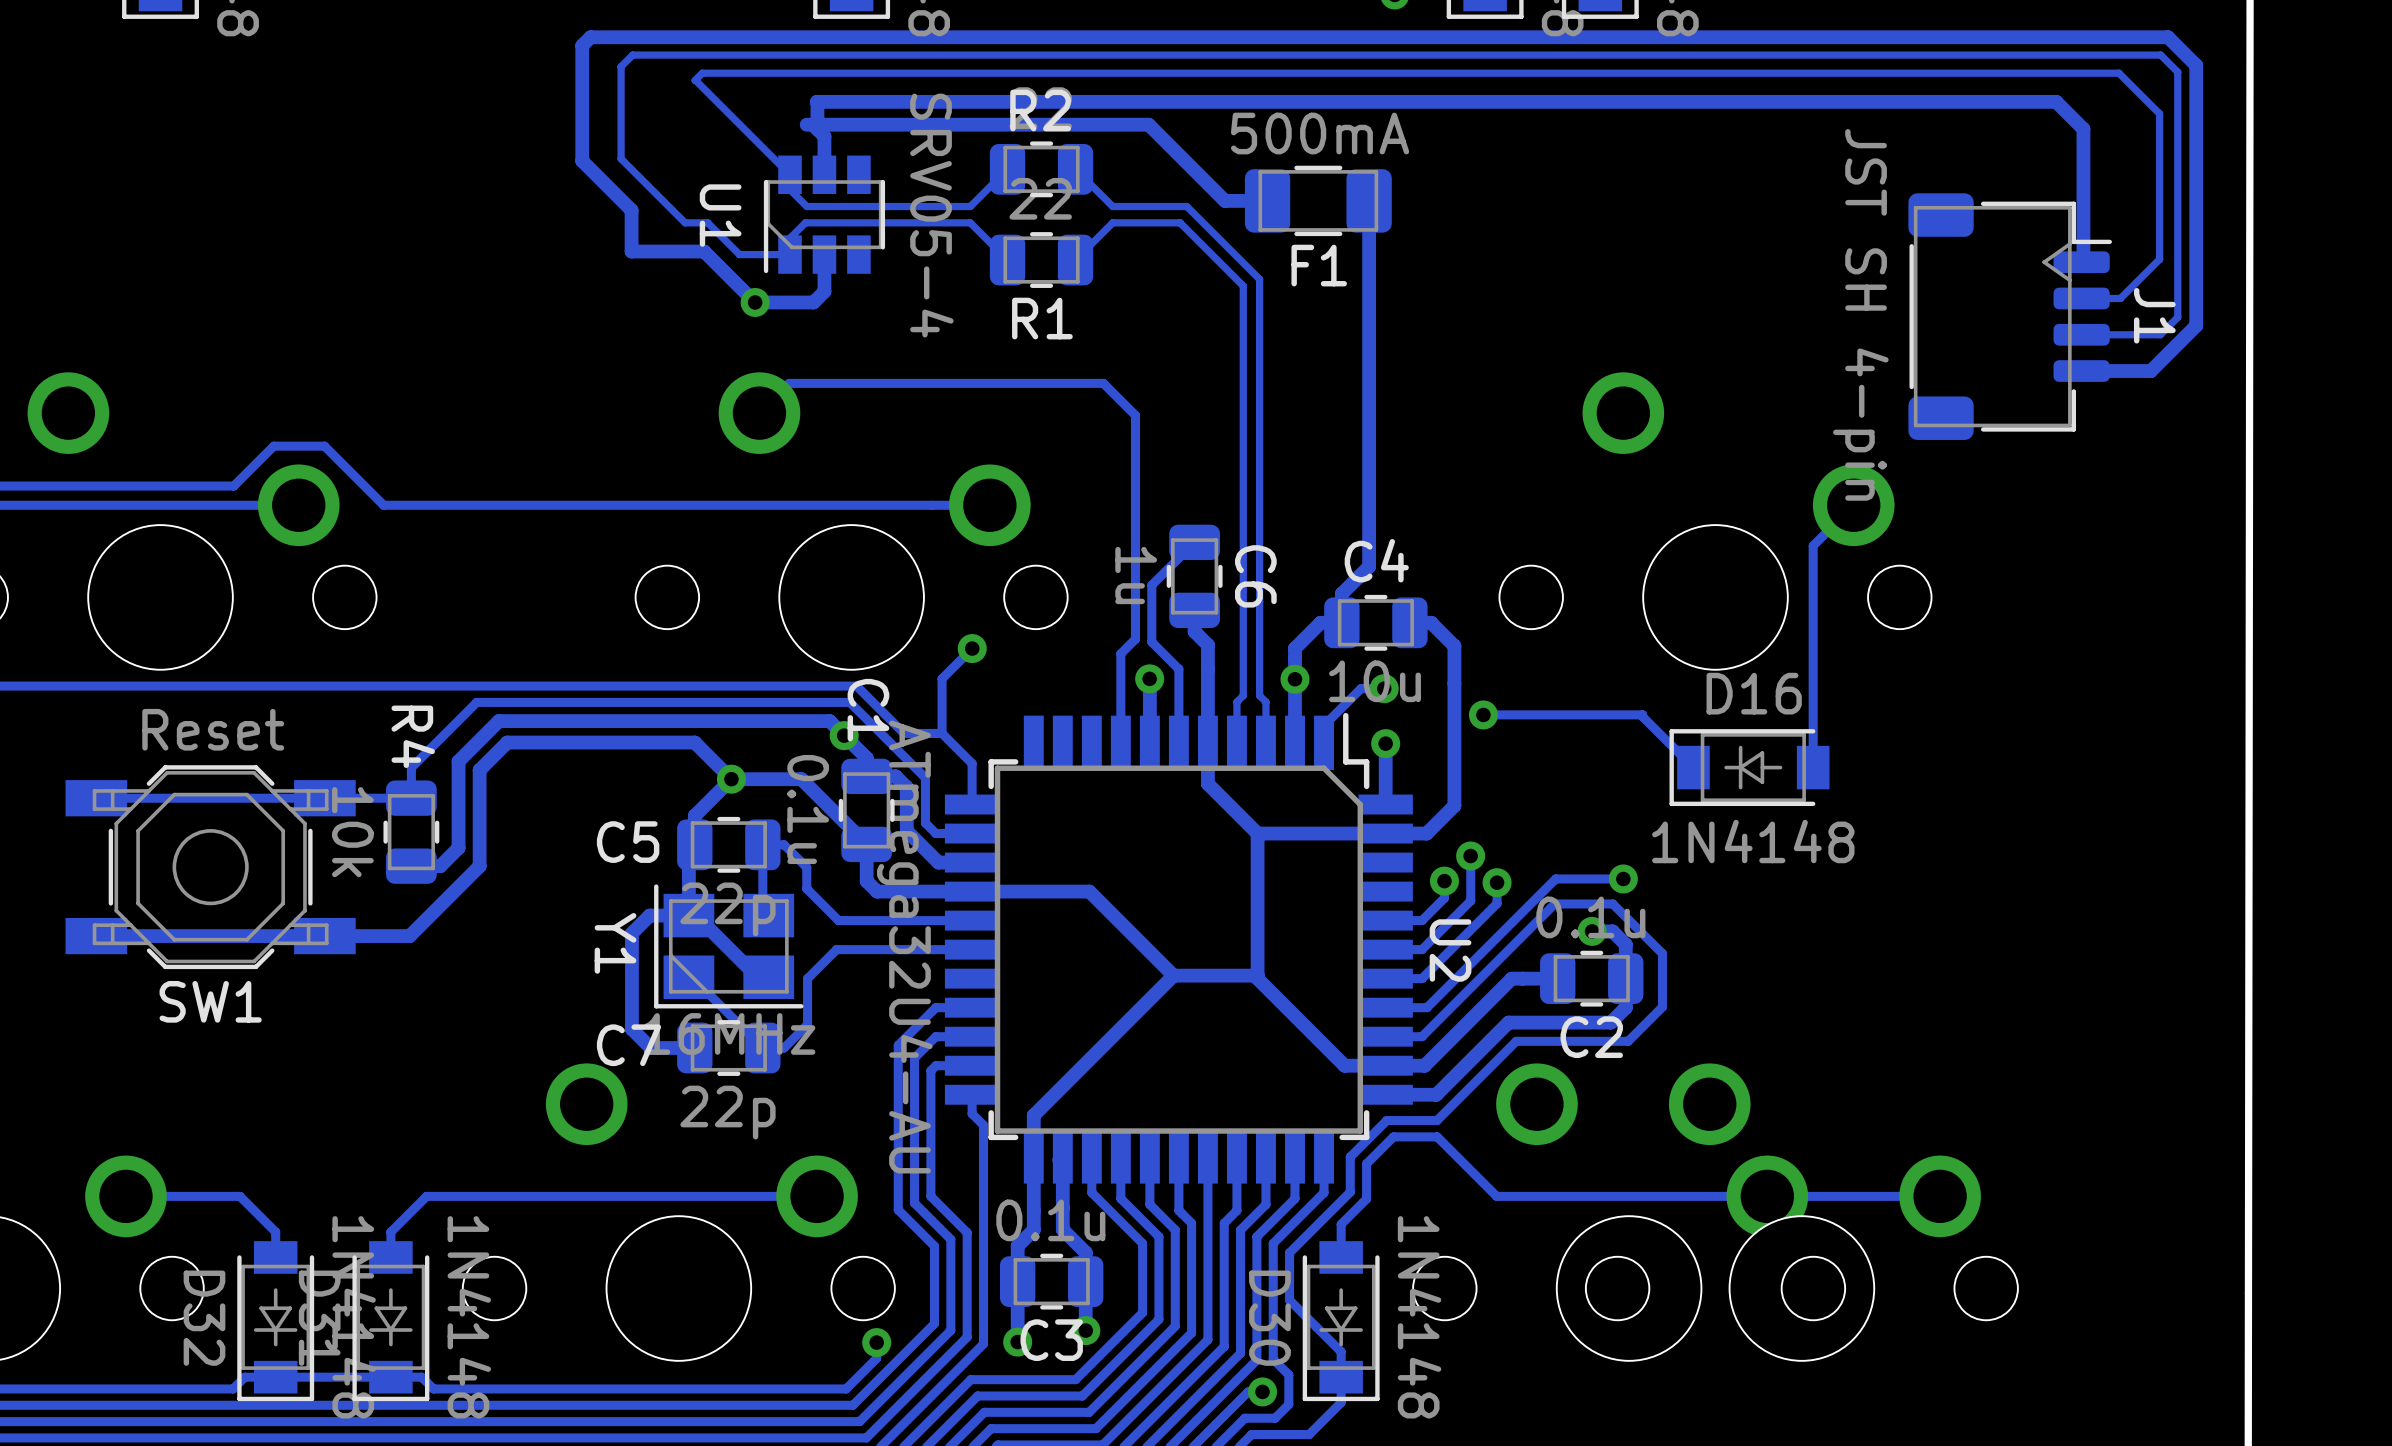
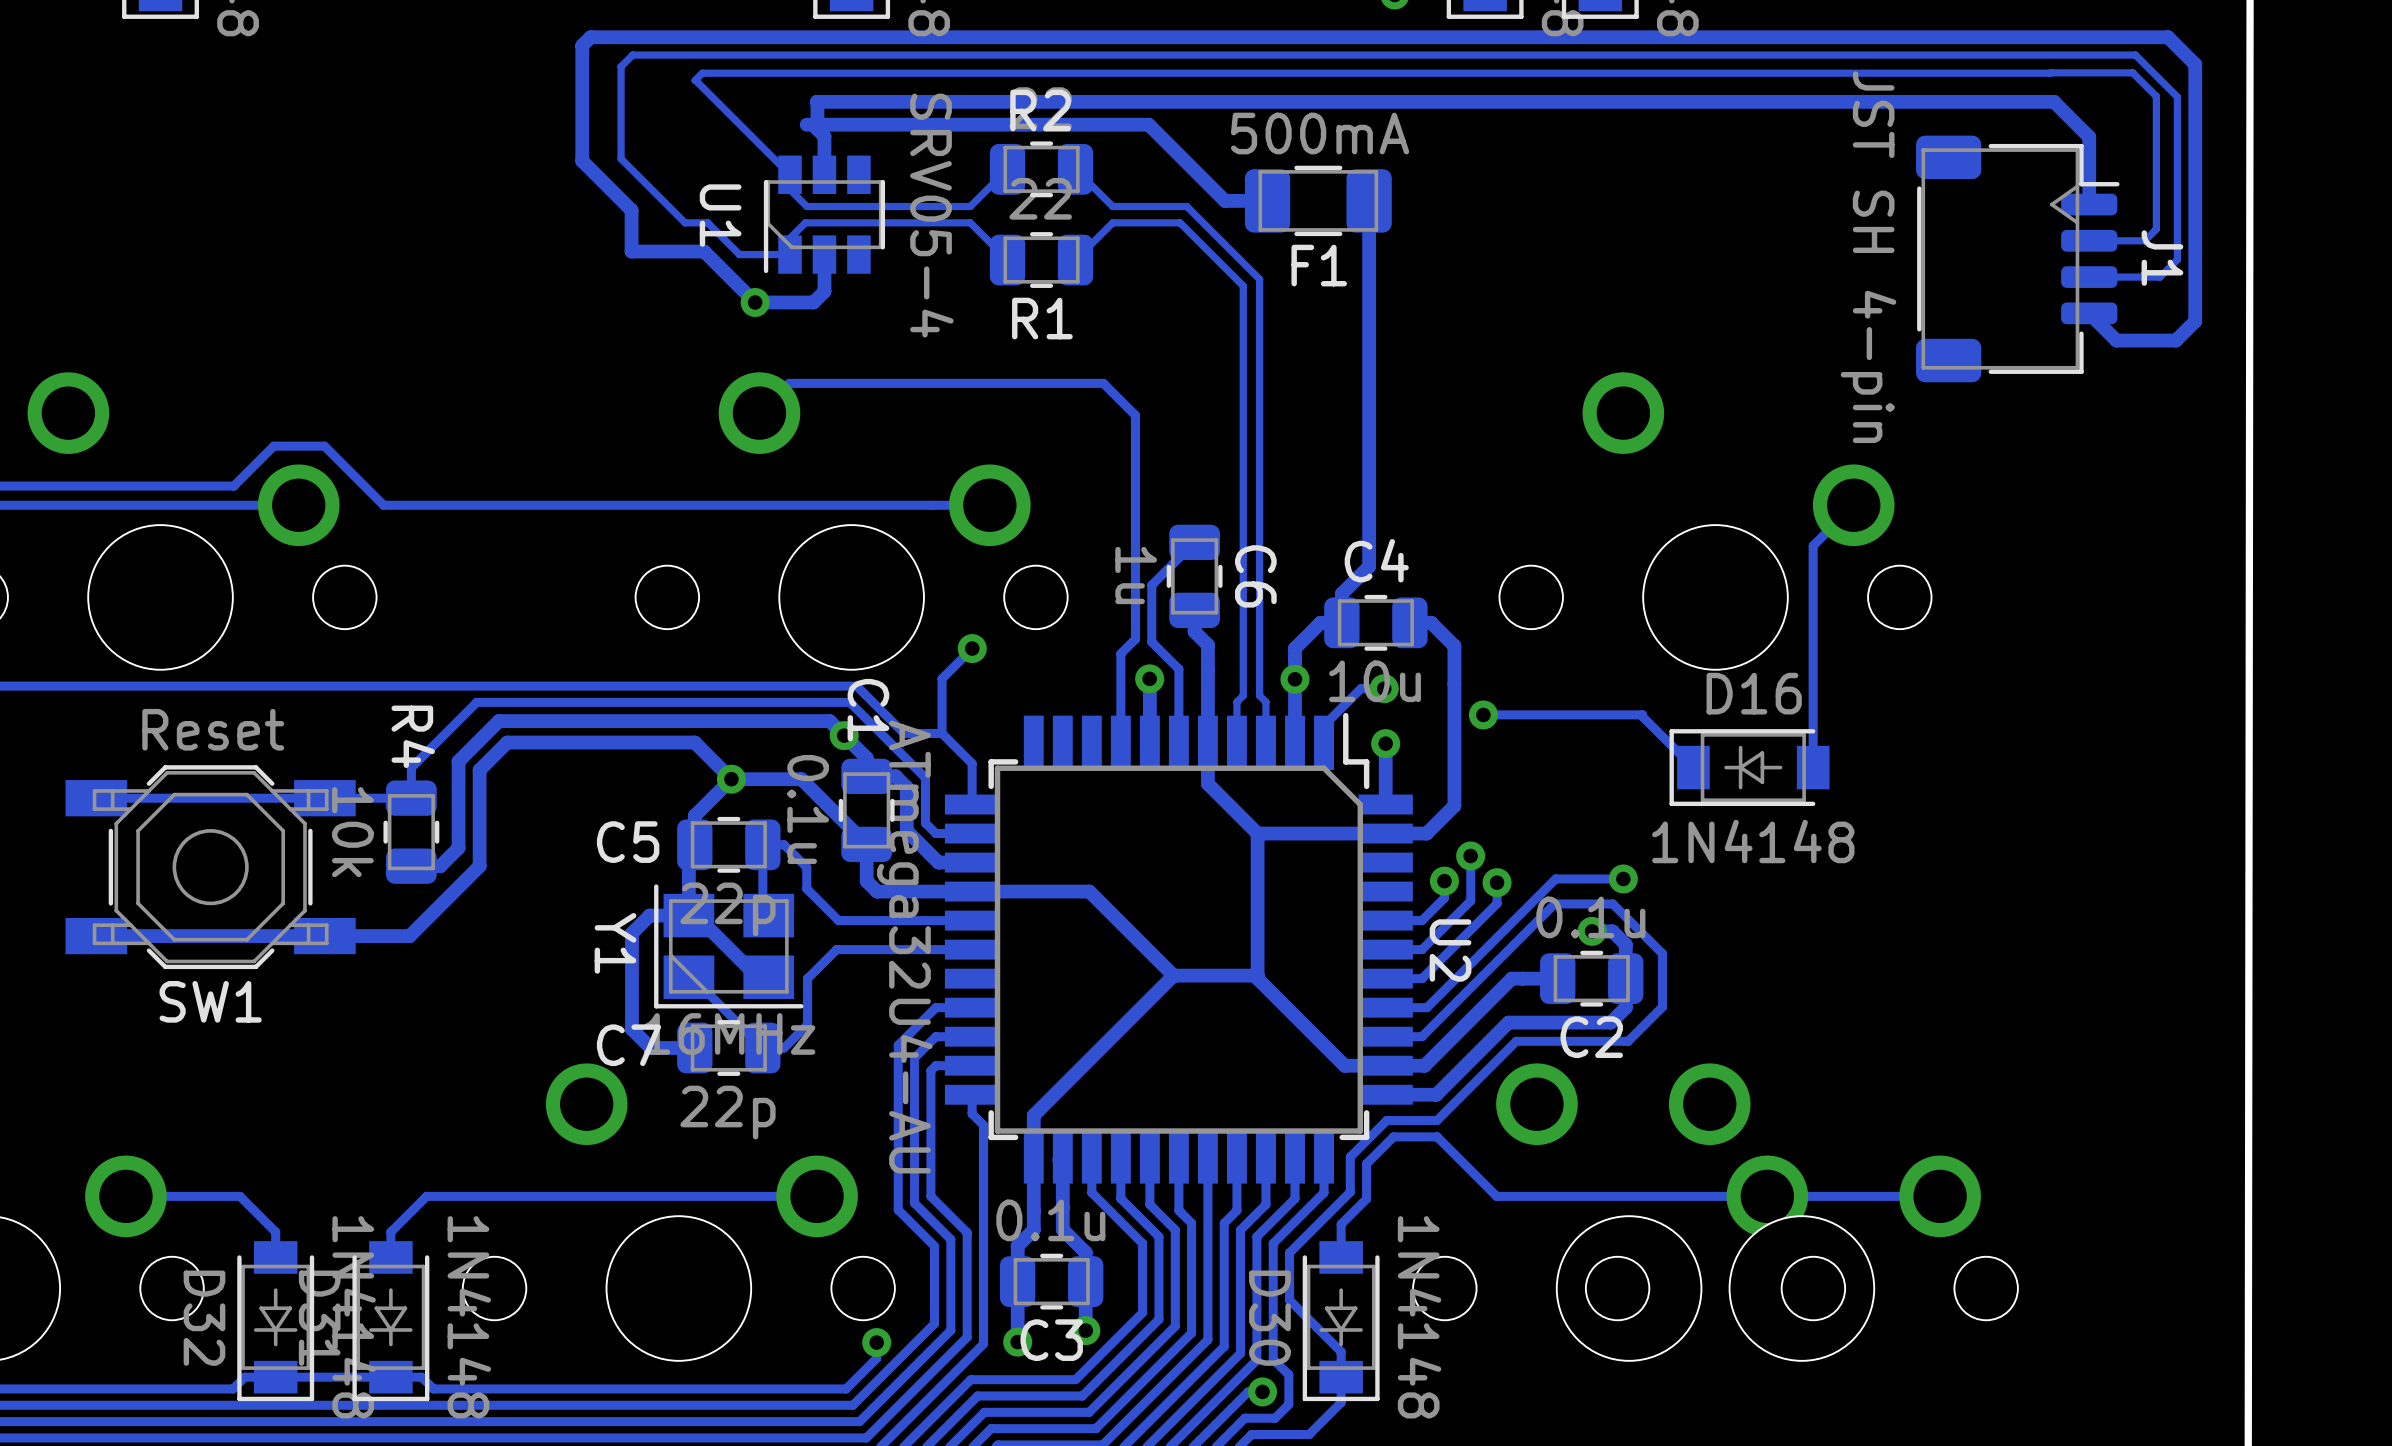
track: (2135, 55) (2160, 55) (2177, 72) (2177, 317) (2160, 334) (2081, 334) -> (2135, 55) (2177, 96) (2177, 259) (2160, 277) (2089, 277)
track: (2195, 64) (2196, 325) (2150, 371) (2081, 371) -> (2195, 64) (2195, 321) (2175, 340) (2116, 340) (2089, 313)
track: (2050, 73) (2119, 73) (2159, 113) (2159, 259) (2120, 298) (2081, 298) -> (2050, 72) (2132, 72) (2156, 96) (2156, 229) (2144, 240) (2089, 240)
track: (2054, 101) (2083, 129) (2083, 260) (2081, 262) -> (2054, 101) (2089, 137) (2089, 204)
J1 position: (2010, 316) -> (2017, 258)

